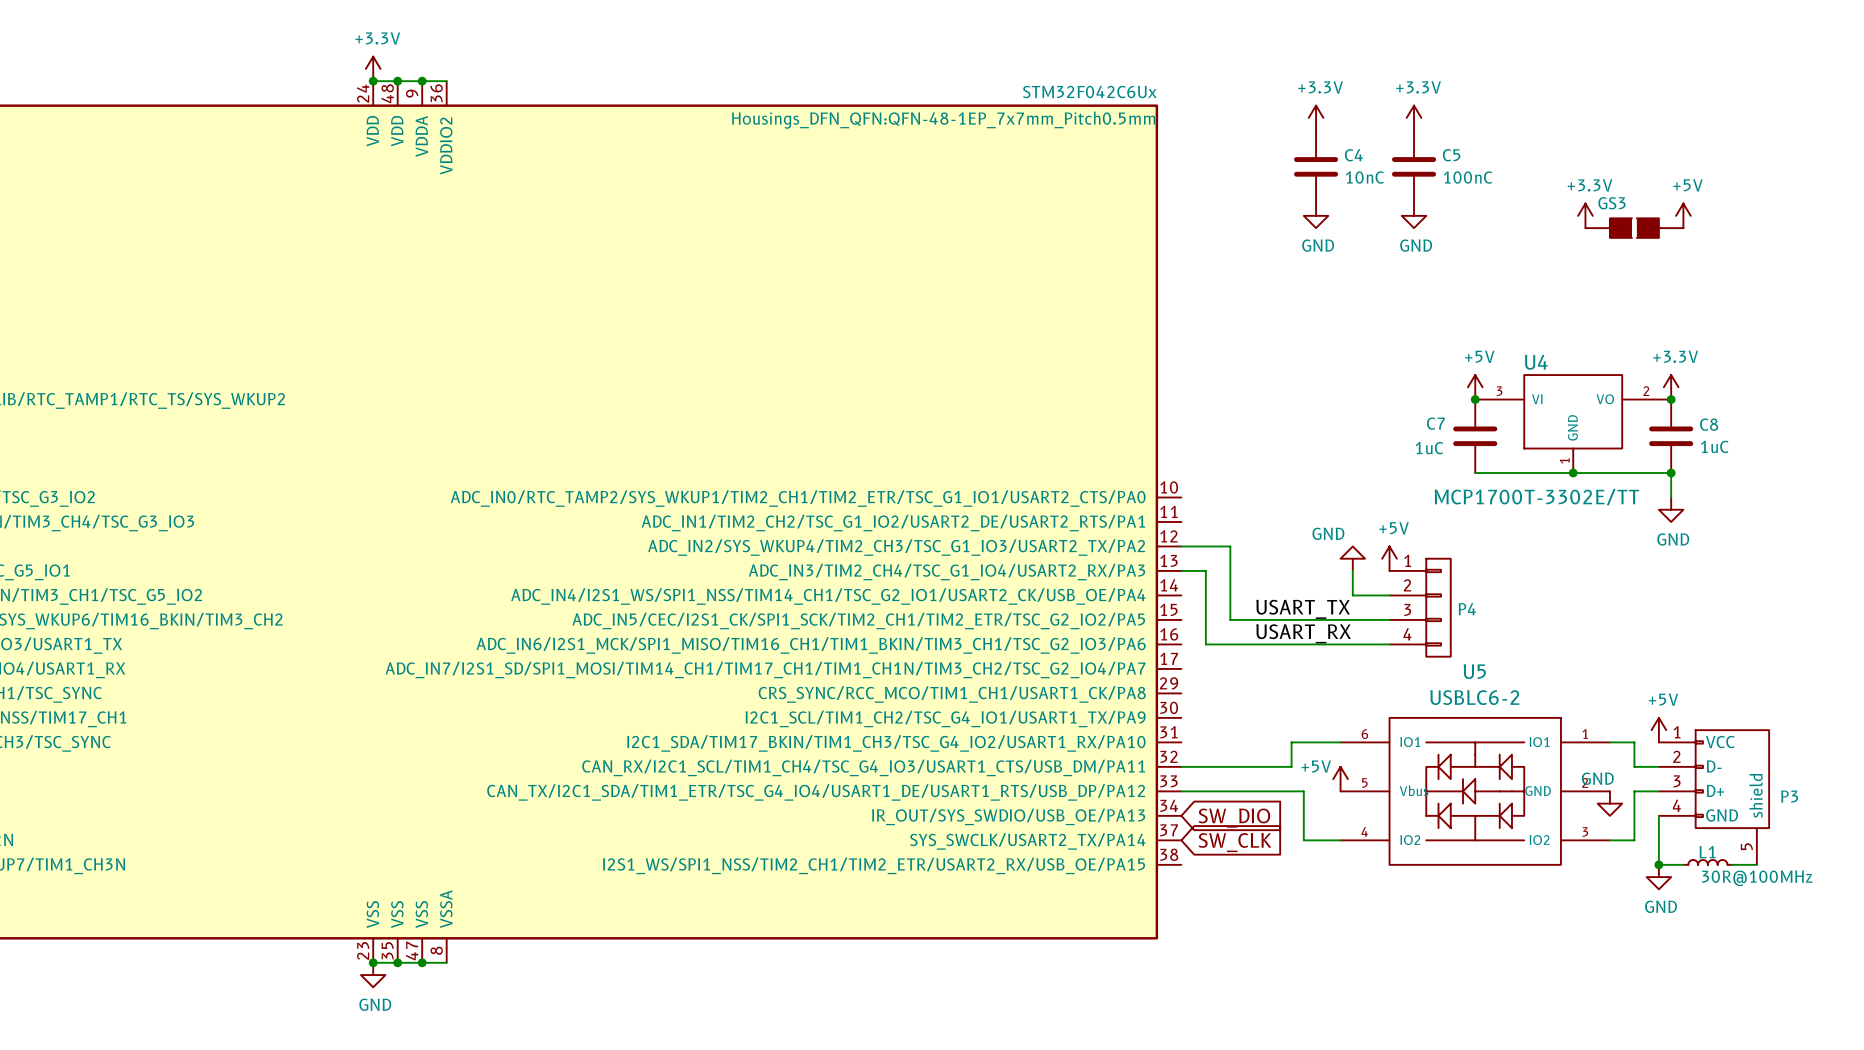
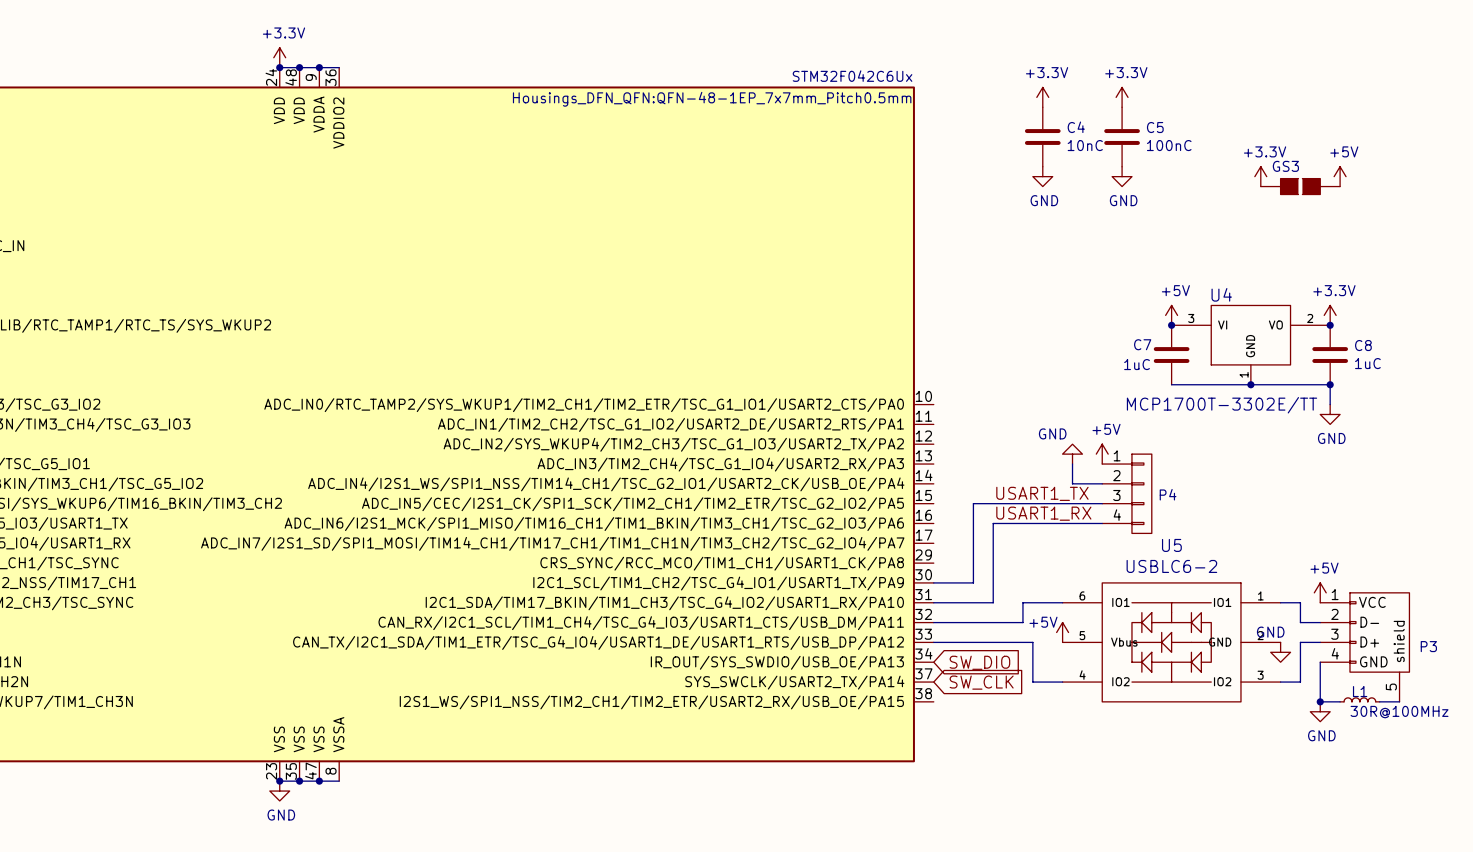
wire: (1181, 546) (1230, 546) (1230, 619) -> (933, 582) (973, 582) (973, 503)
wire: (1181, 570) (1205, 570) (1205, 644) (1254, 644) -> (933, 602) (993, 602) (993, 523)
label: USART_TX (1303, 609) -> USART1_TX (1042, 493)
label: USART_RX (1303, 633) -> USART1_RX (1043, 513)

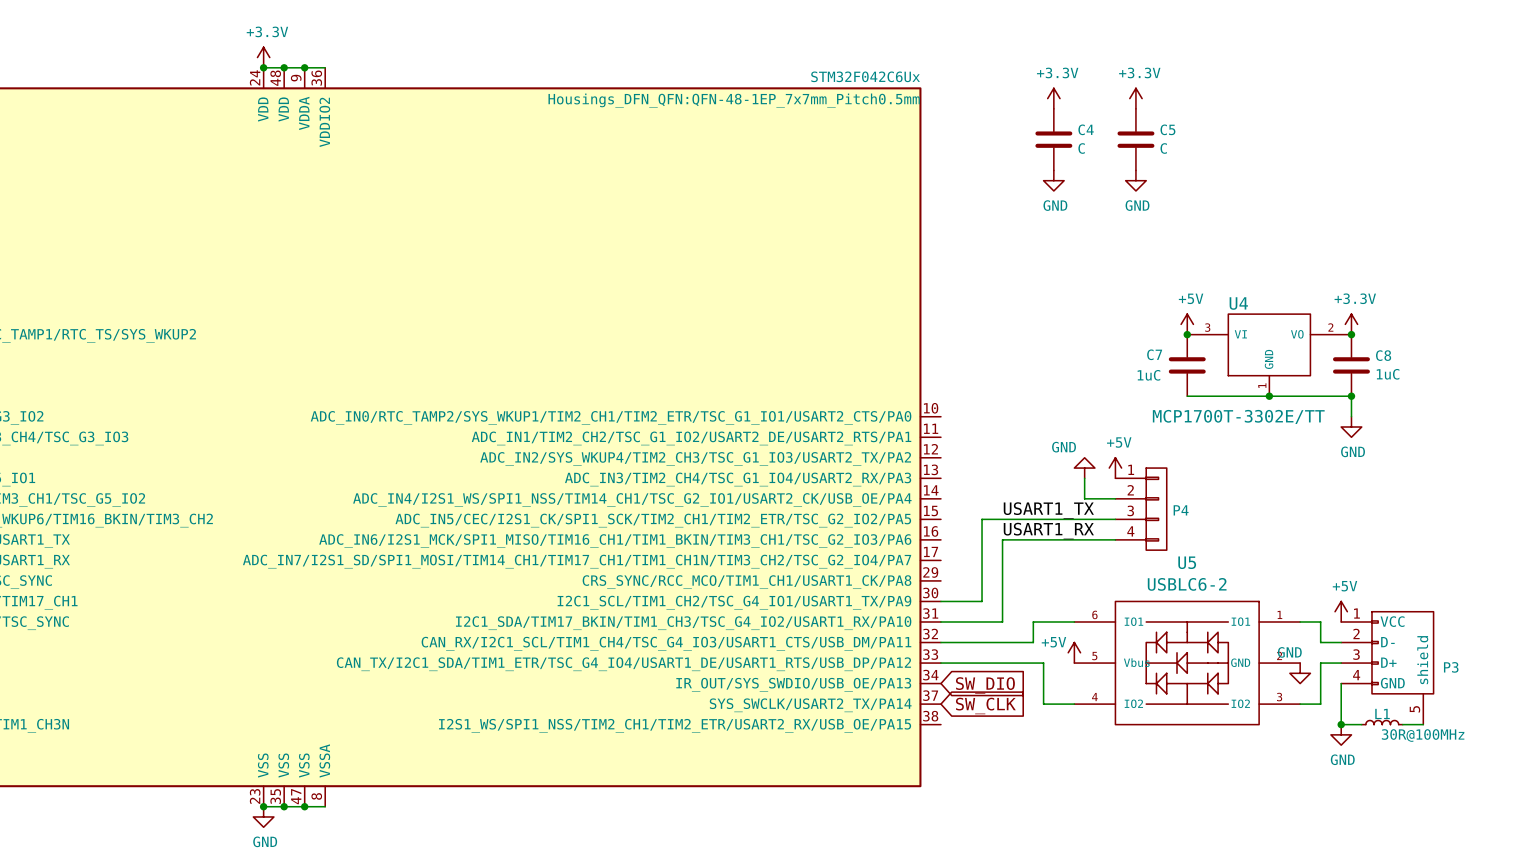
C4 value: 10nC (1085, 145) -> C (1081, 148)
C5 value: 100nC (1169, 145) -> C (1163, 148)
power symbol: +3.3V (1260, 176) -> none
power symbol: +5V (1340, 176) -> none
GS3: (1300, 186) -> none

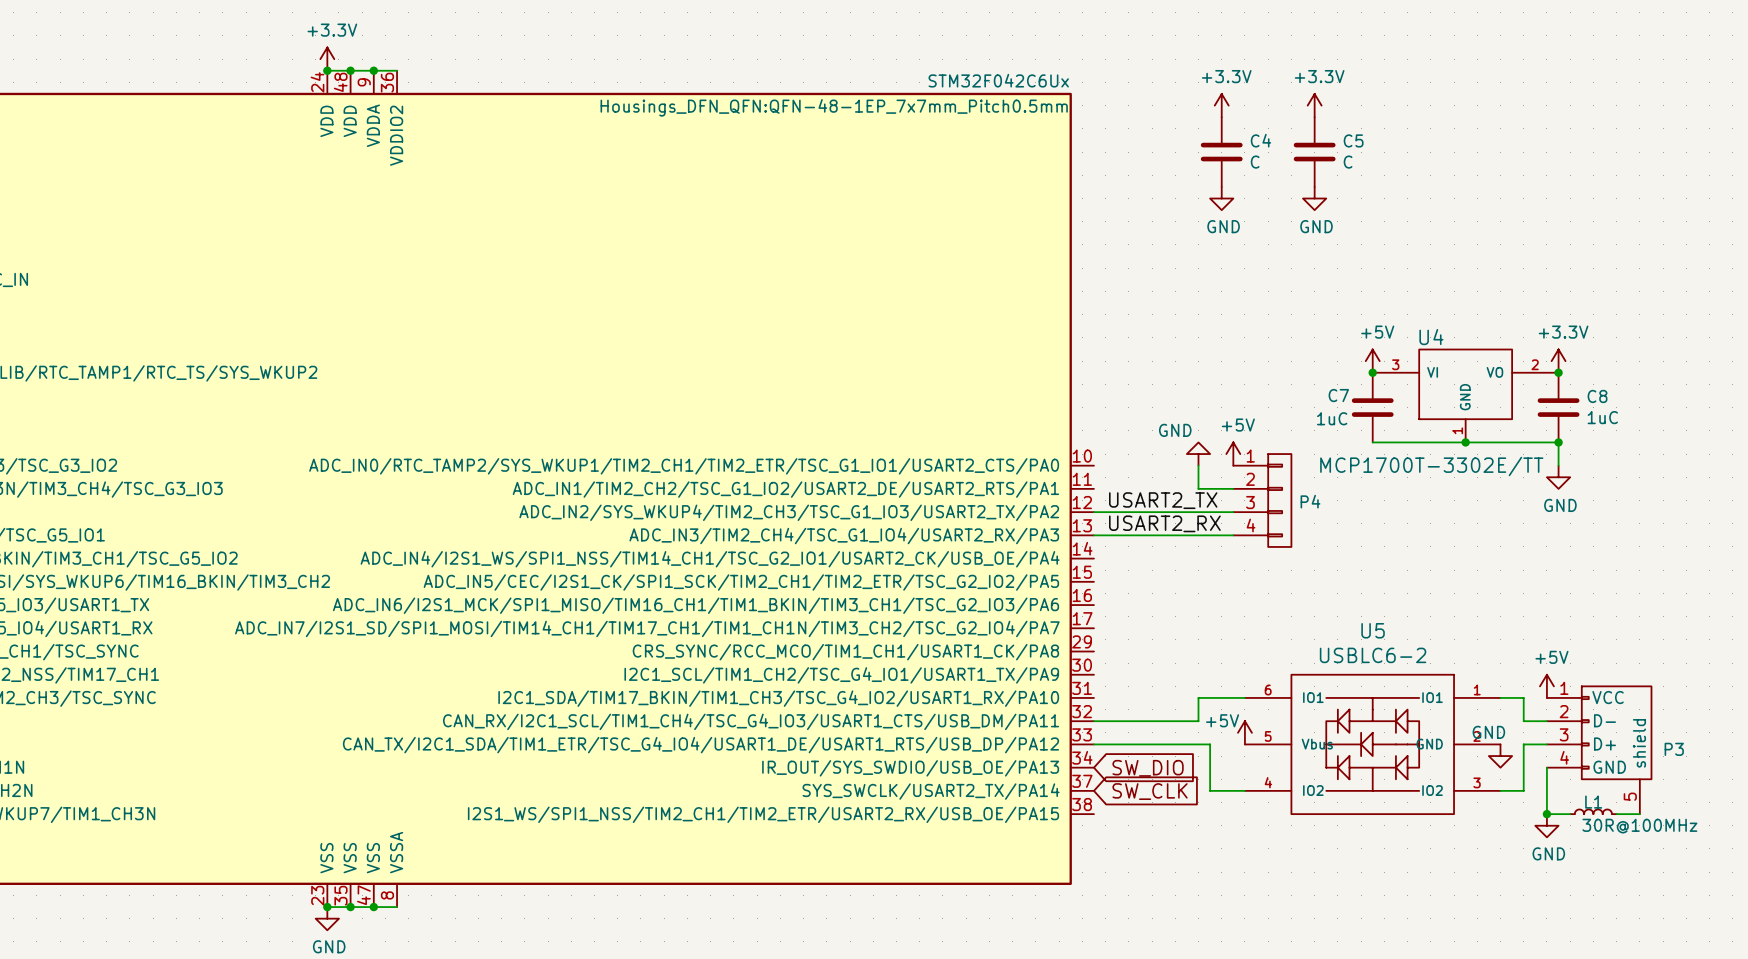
label: none -> USART2_TX (1163, 500)
wire: none -> (1093, 512) (1233, 512)
power symbol position: GND (1084, 468) -> GND (1198, 454)
power symbol position: +5V (1115, 468) -> +5V (1233, 454)
label: none -> USART2_RX (1164, 523)
wire: none -> (1093, 535) (1233, 535)
wire: (1084, 478) (1084, 498) (1115, 498) -> (1198, 465) (1198, 488) (1233, 488)
P4 position: (1141, 509) -> (1262, 500)
label: USART1_TX (1048, 510) -> none
wire: (1115, 519) (982, 519) (982, 601) (940, 601) -> none
label: USART1_RX (1048, 531) -> none
wire: (1115, 539) (1002, 539) (1002, 621) (940, 621) -> none

